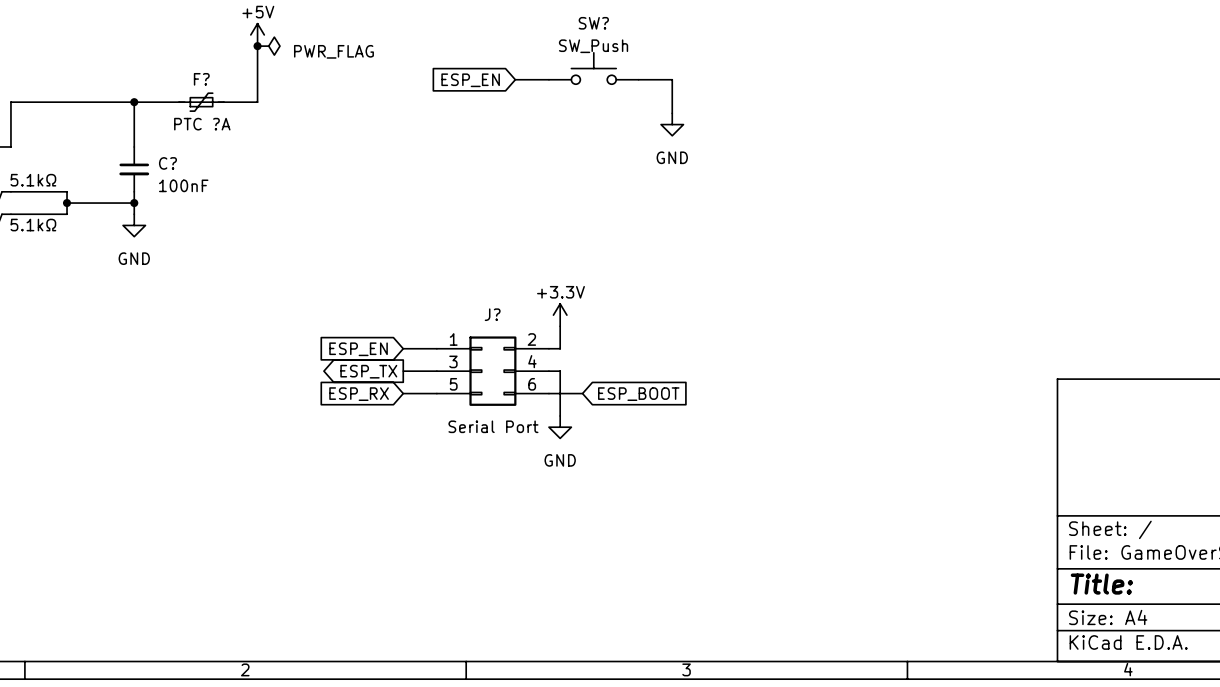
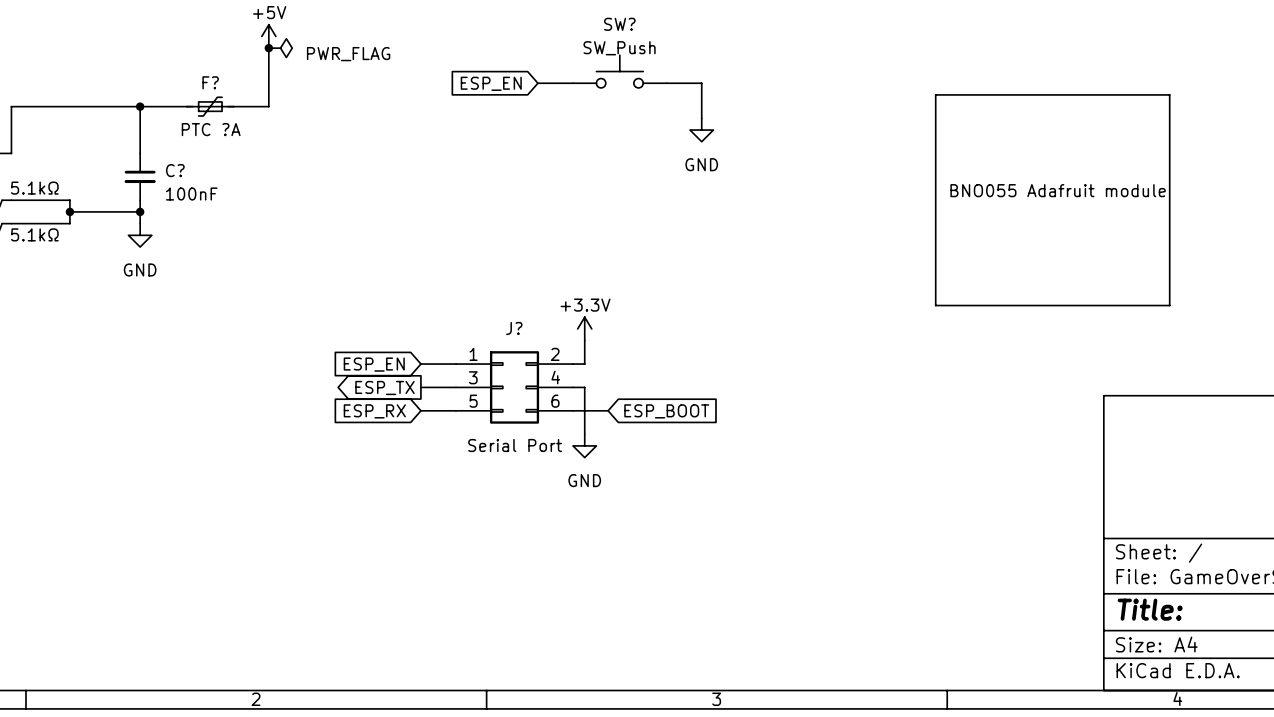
line: none -> (935, 94) (935, 305) (1169, 305) (1169, 94) (935, 94)
text: none -> BNO055 Adafruit module (1058, 190)

